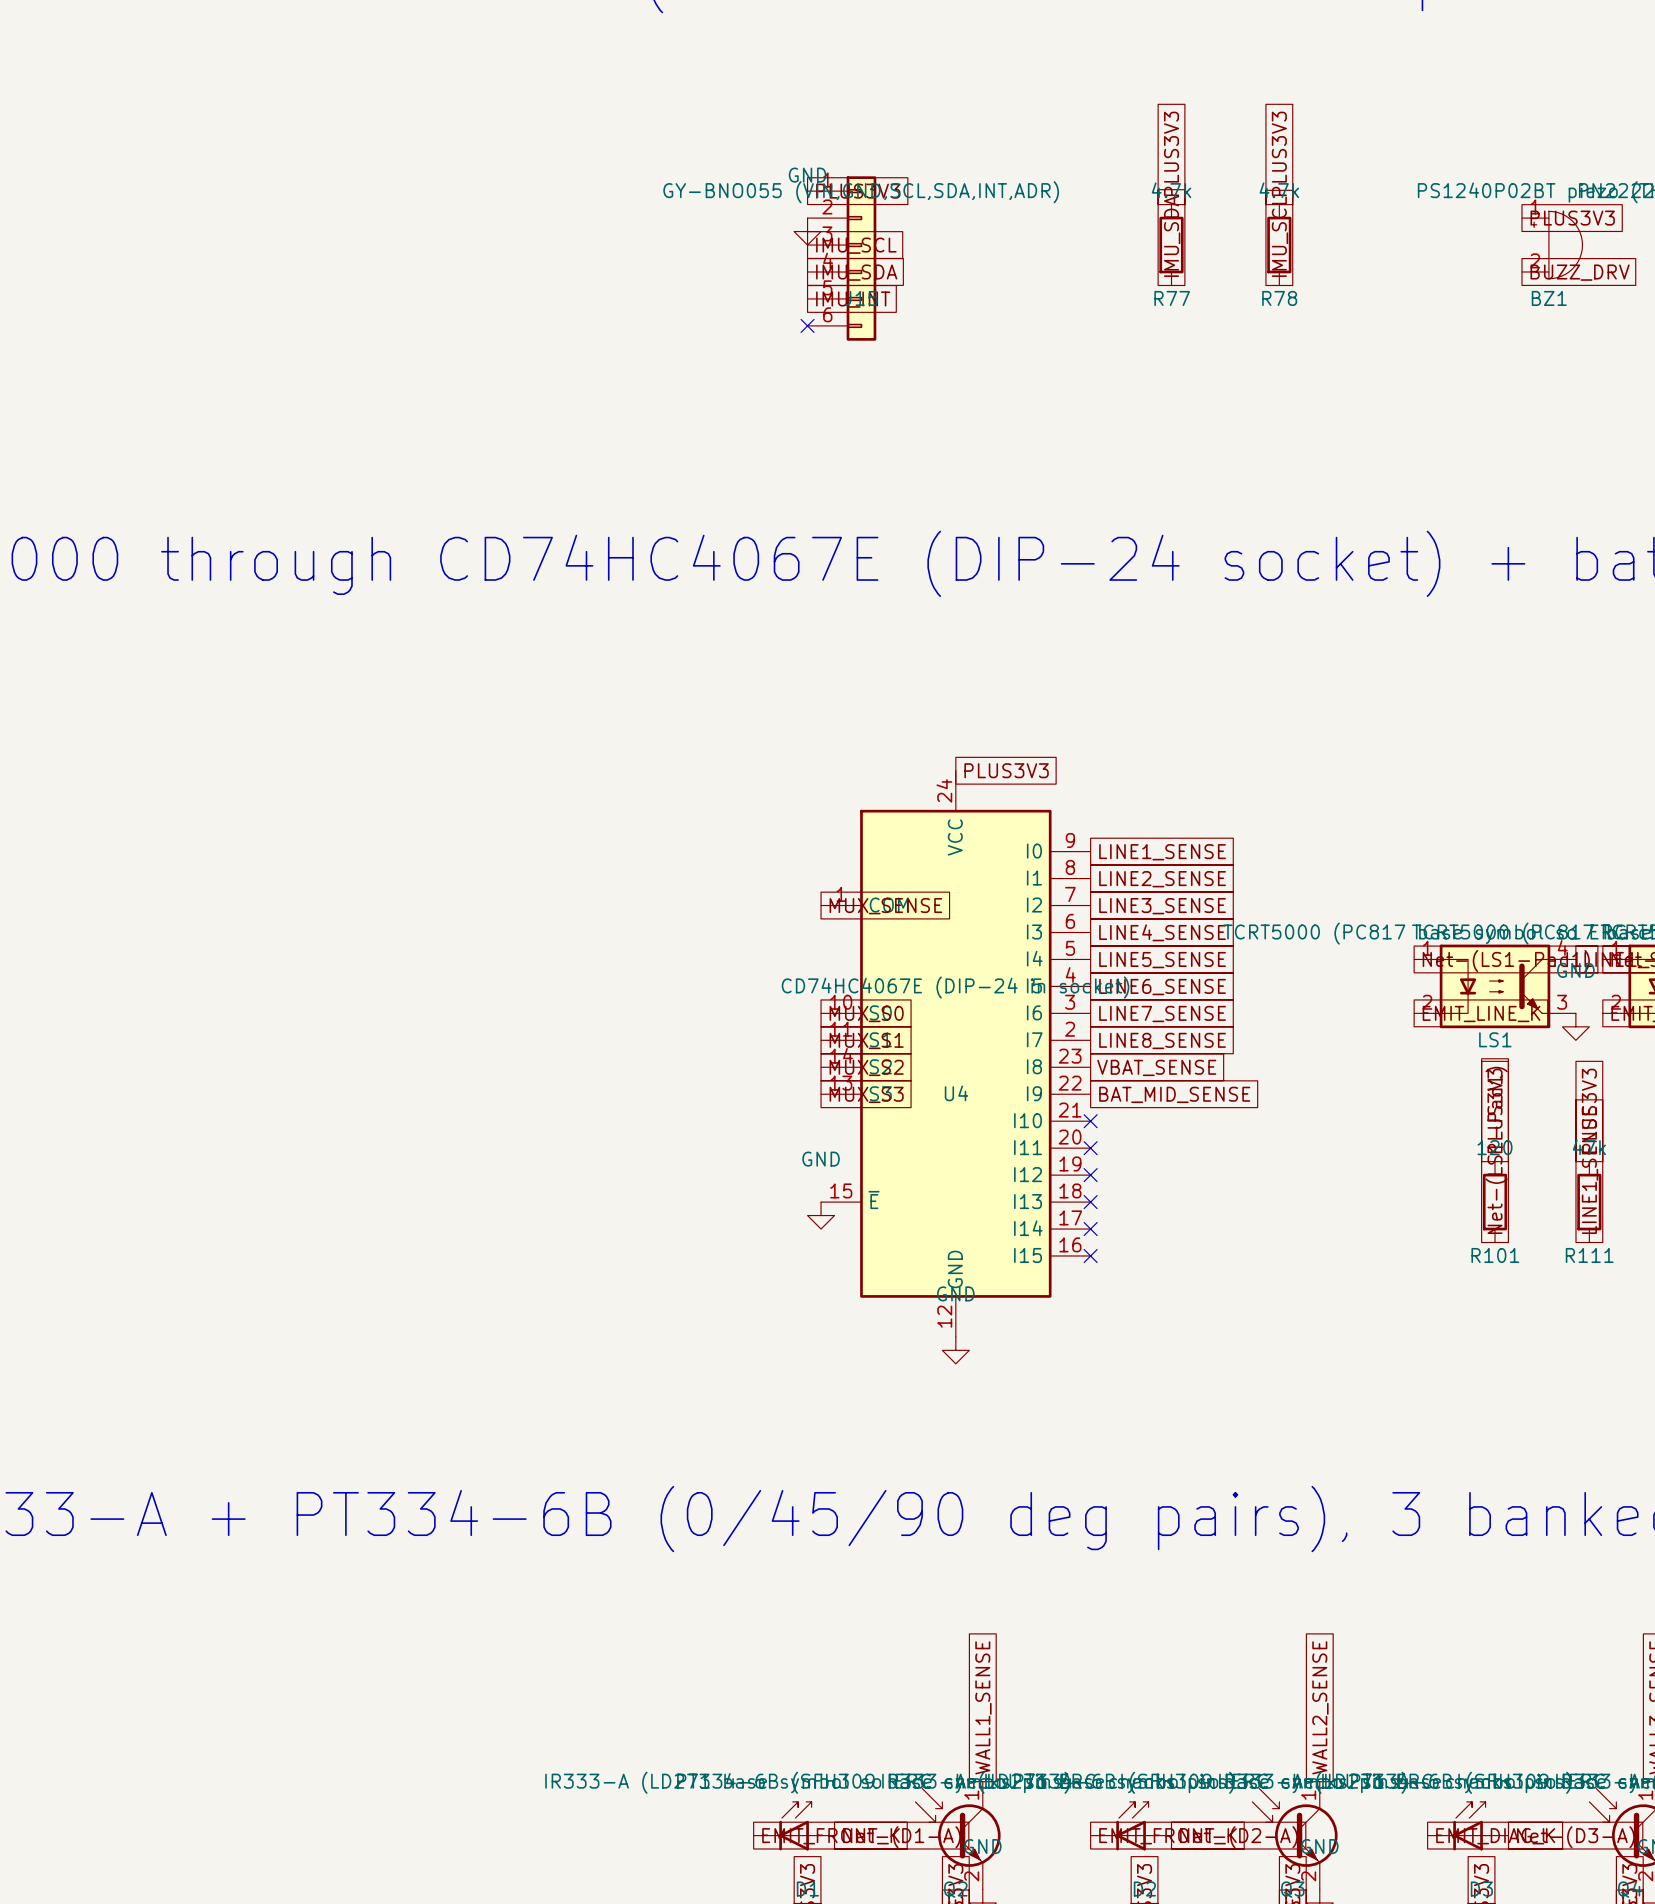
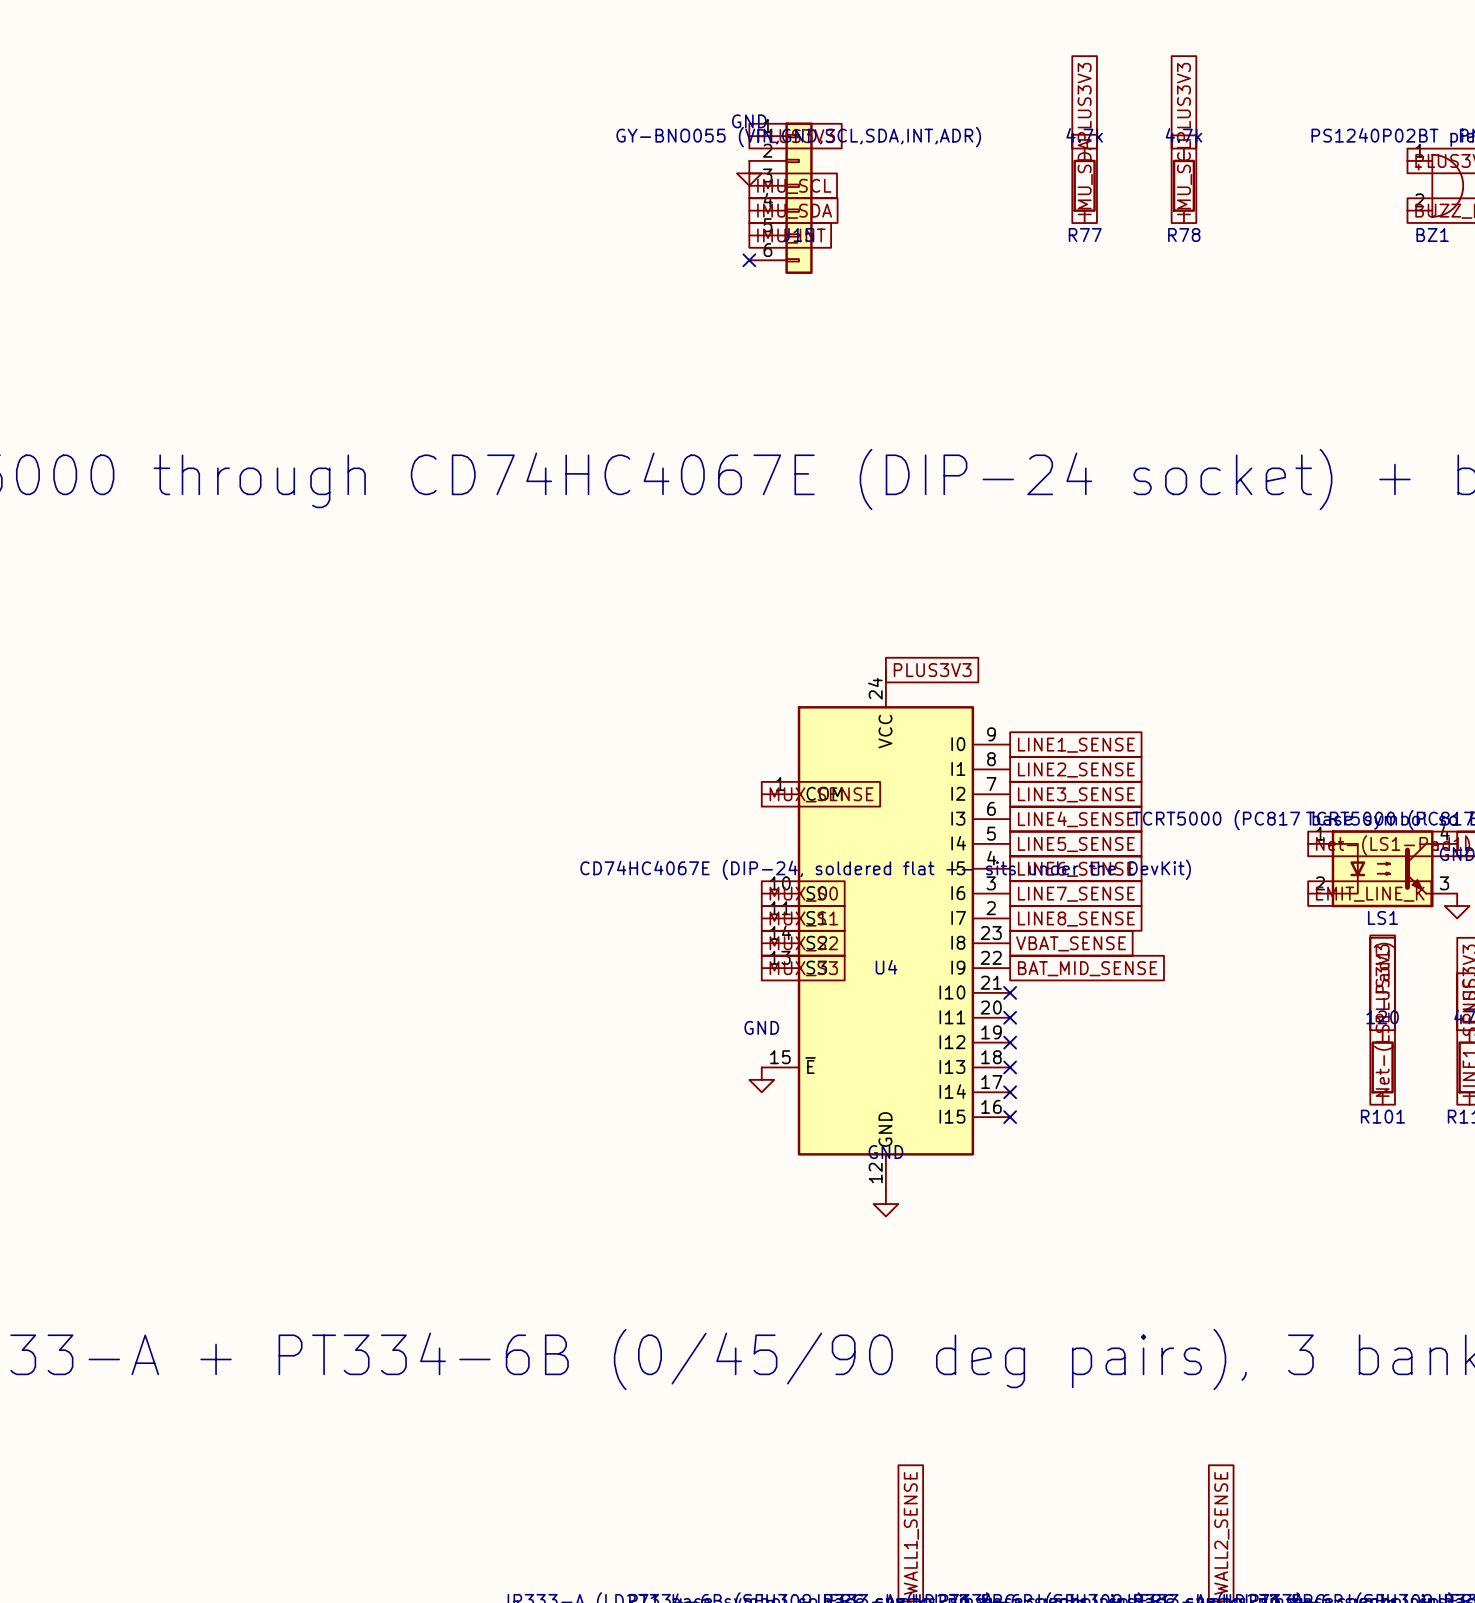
U4 value: CD74HC4067E (DIP-24 in socket) (955, 987) -> CD74HC4067E (DIP-24, soldered flat -- sits under the DevKit) (885, 869)

